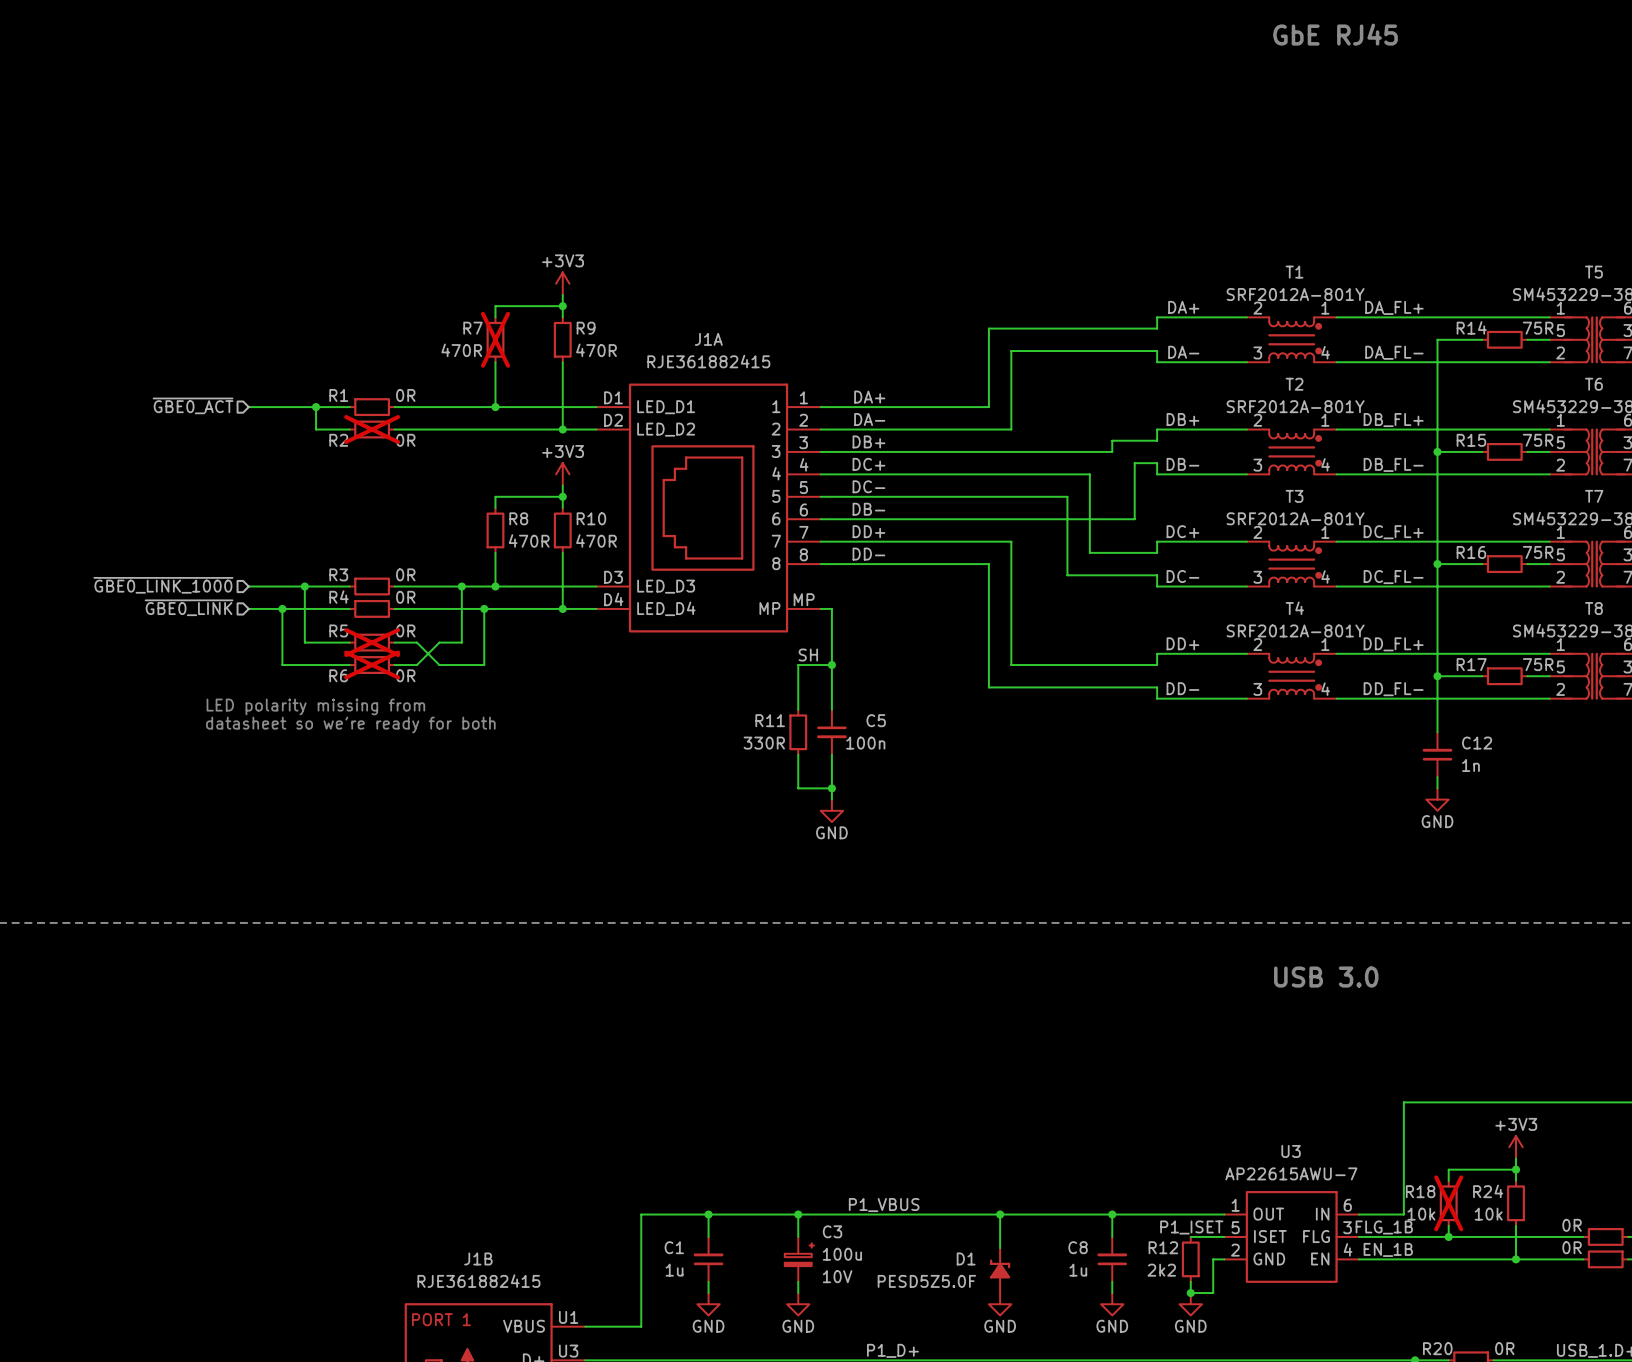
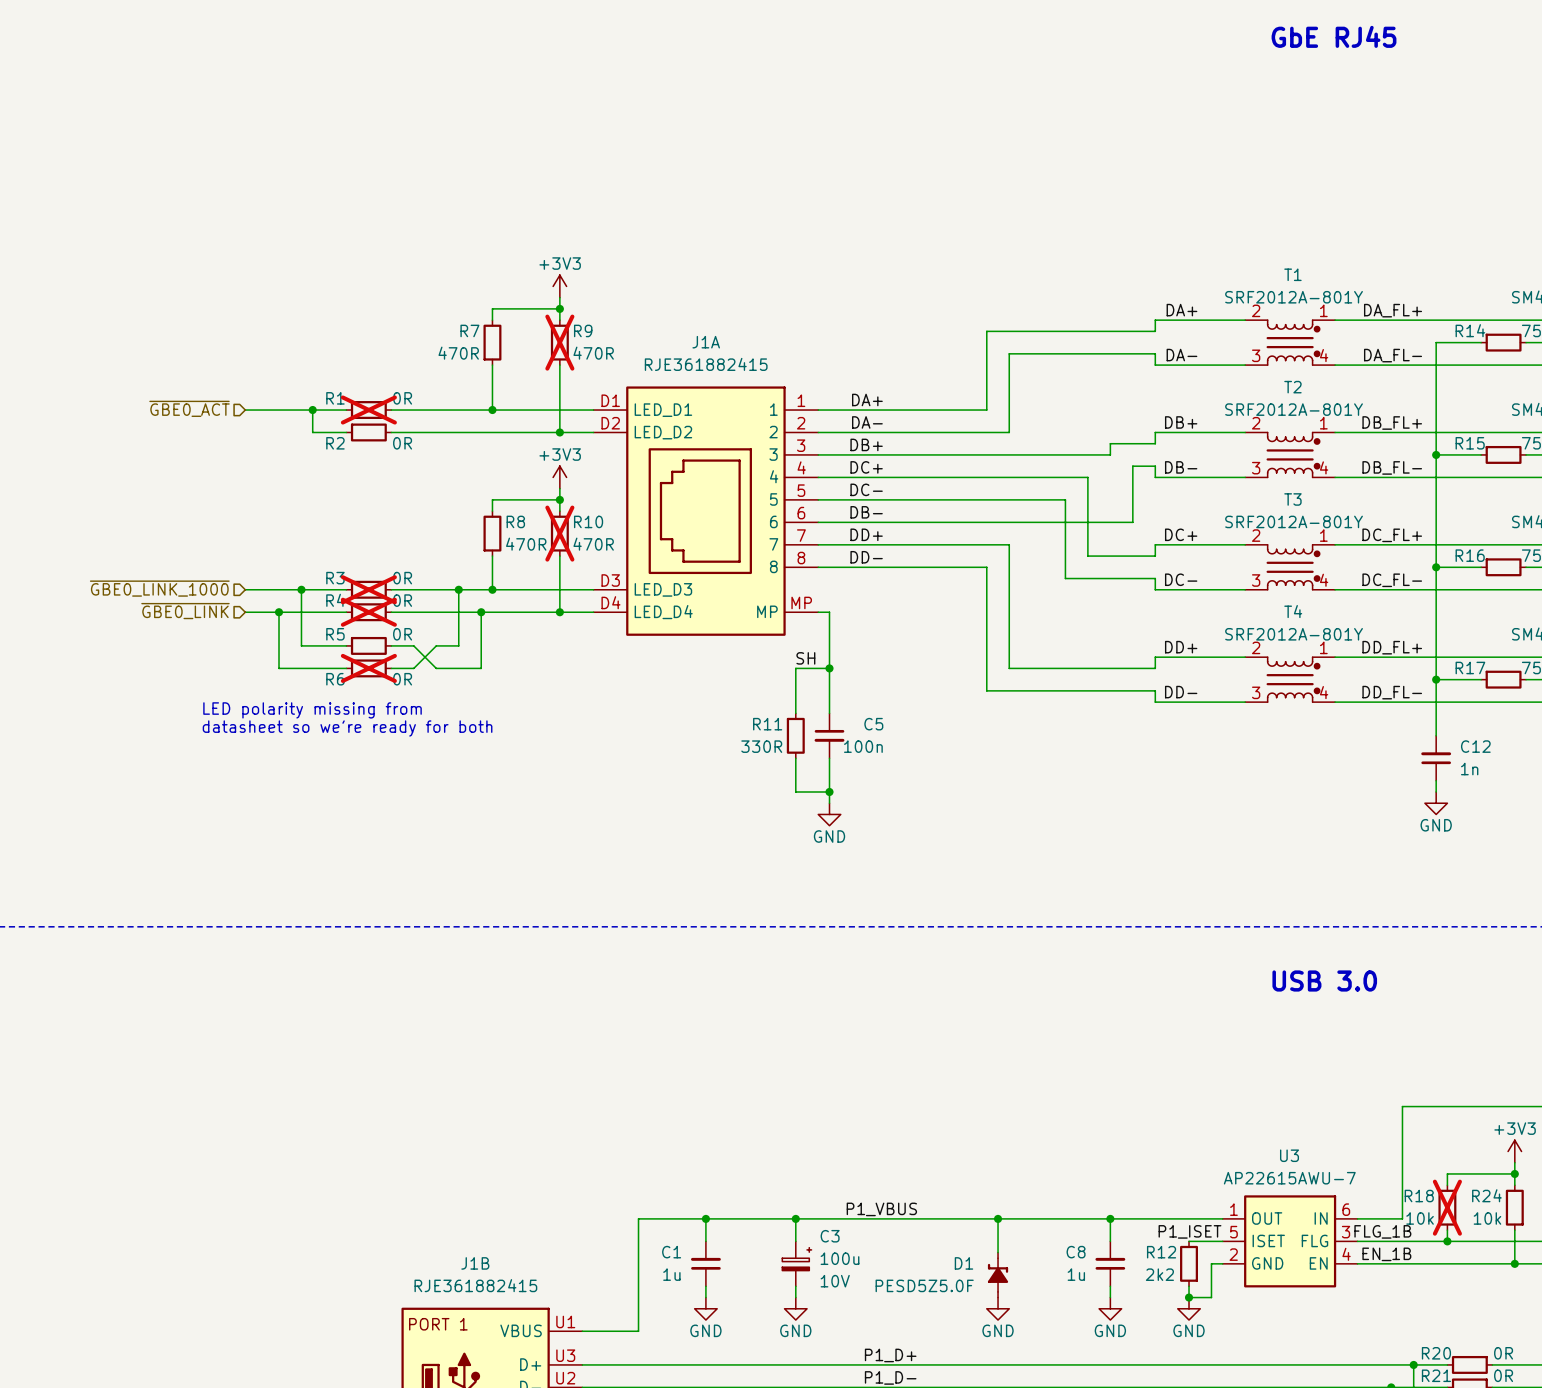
R7 do-not-place cross: (495, 339) -> none
R9 do-not-place cross: none -> (559, 342)
R1 do-not-place cross: none -> (368, 410)
R2 do-not-place cross: (372, 429) -> none
R10 do-not-place cross: none -> (559, 533)
R3 do-not-place cross: none -> (368, 589)
R4 do-not-place cross: none -> (368, 612)
R5 do-not-place cross: (372, 642) -> none

